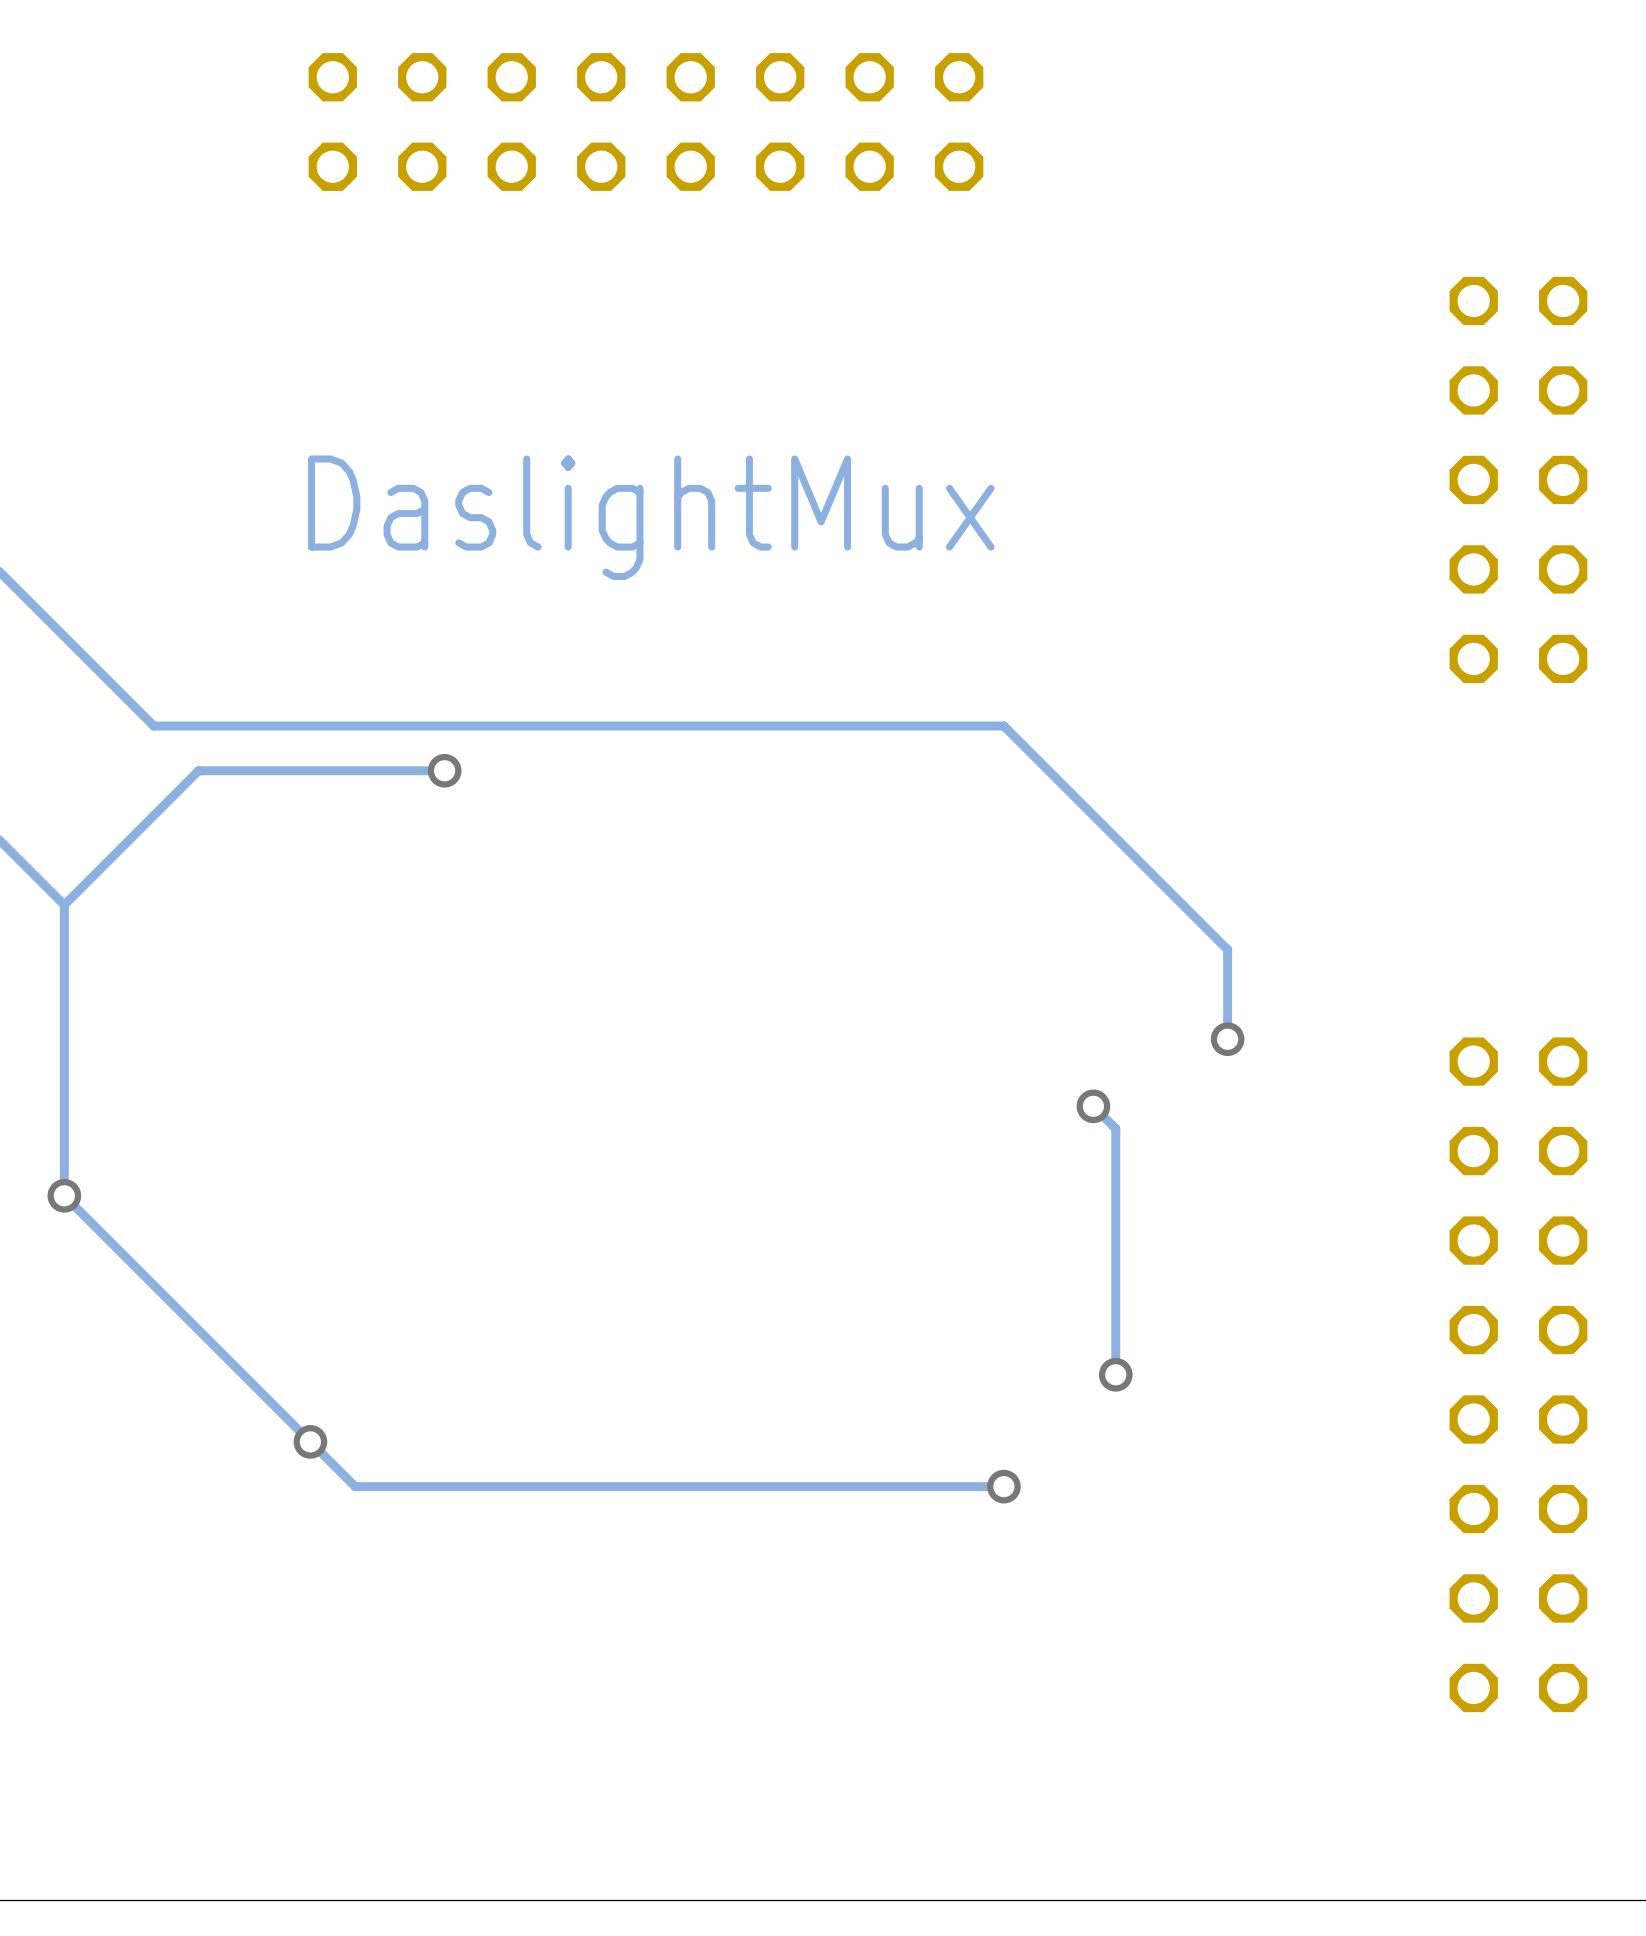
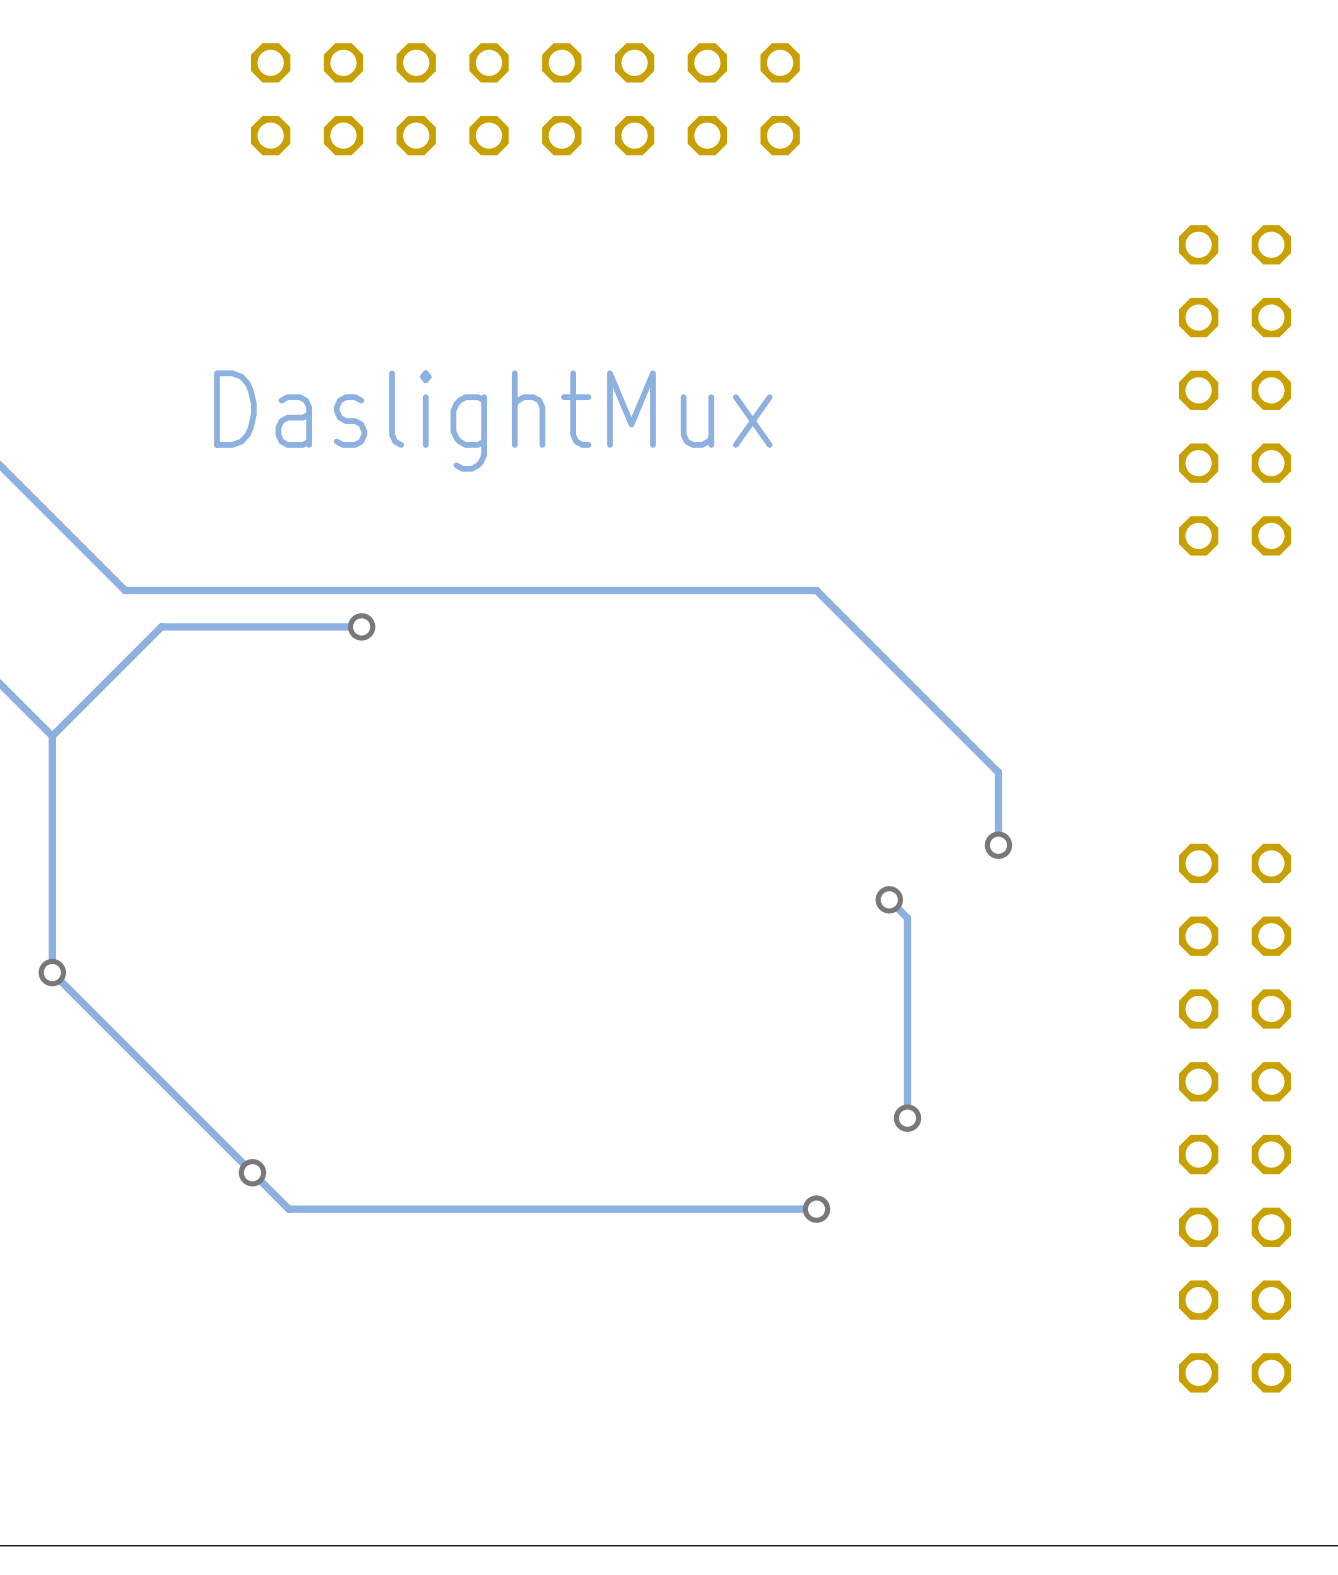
text position: DaslightMux (651, 517) -> DaslightMux (493, 421)

